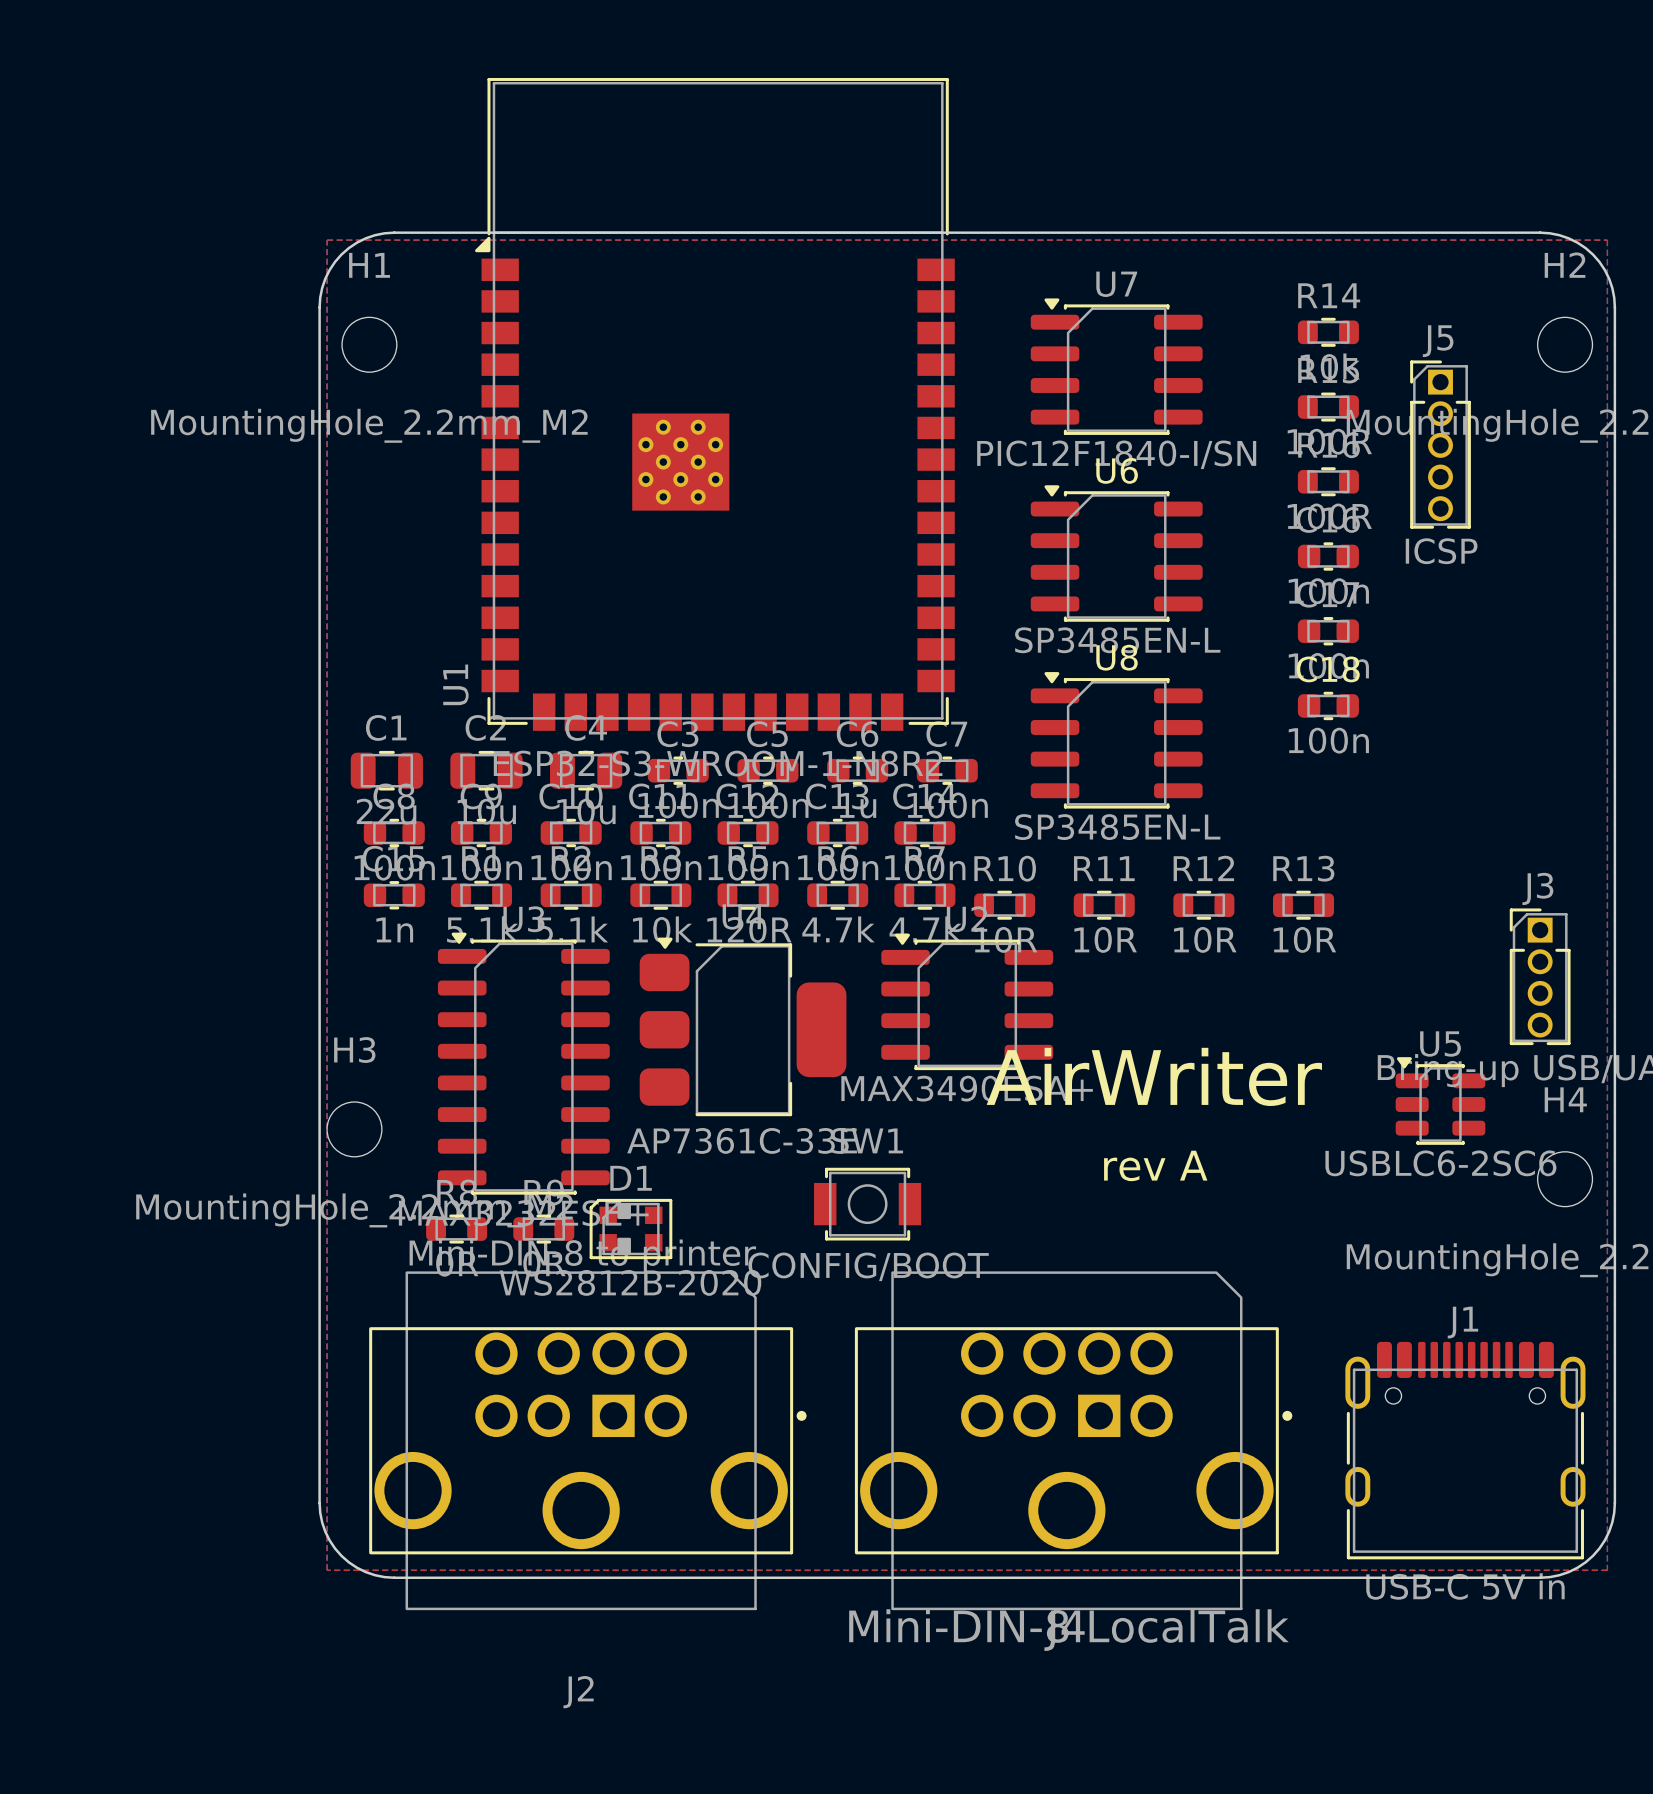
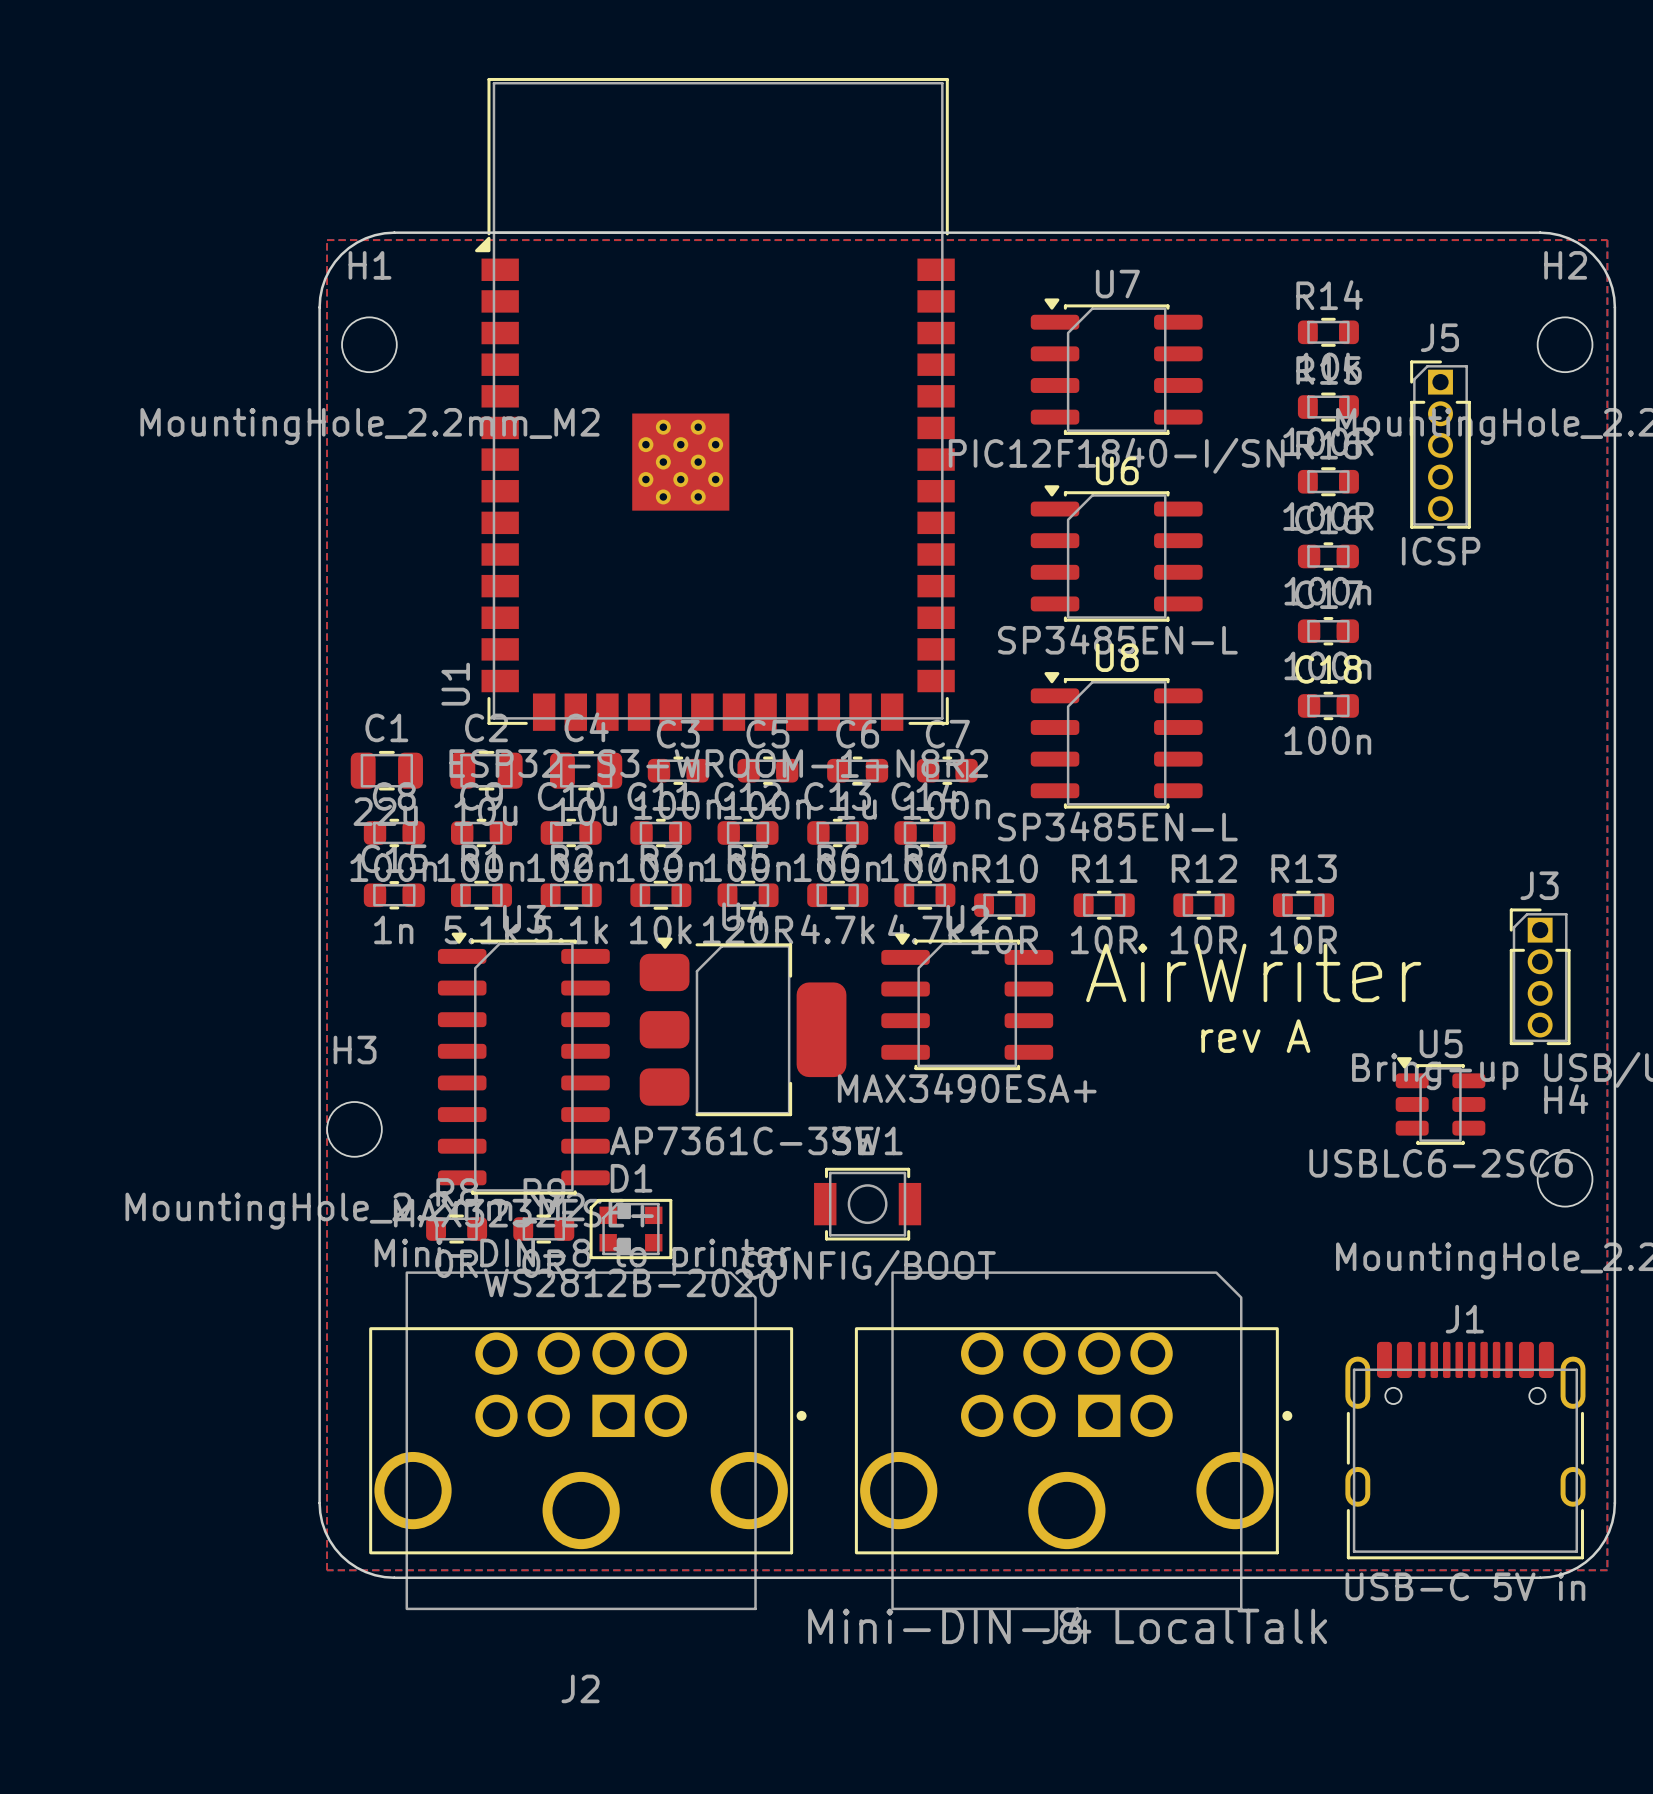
text position: AirWriter (1154, 1076) -> AirWriter (1253, 972)
text position: rev A (1155, 1165) -> rev A (1255, 1036)

